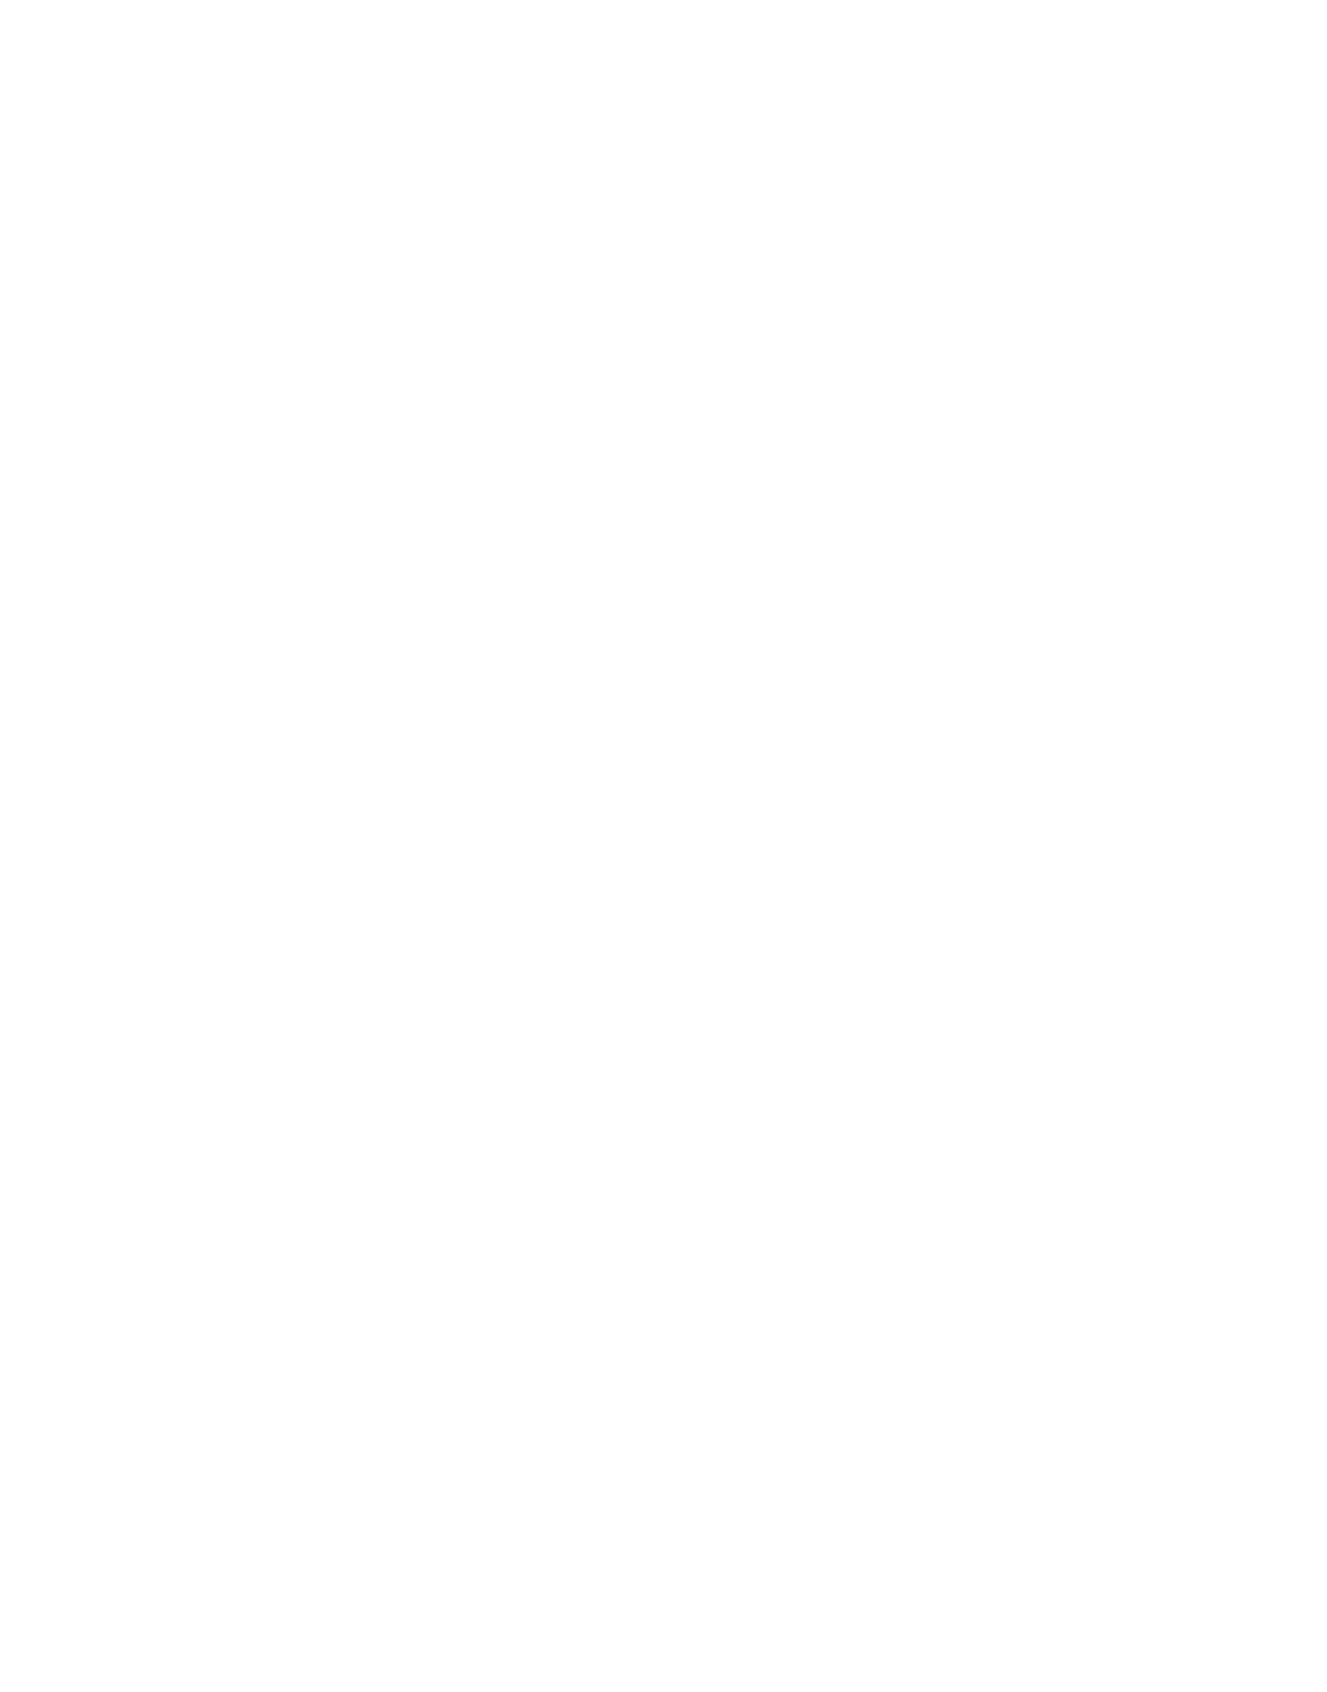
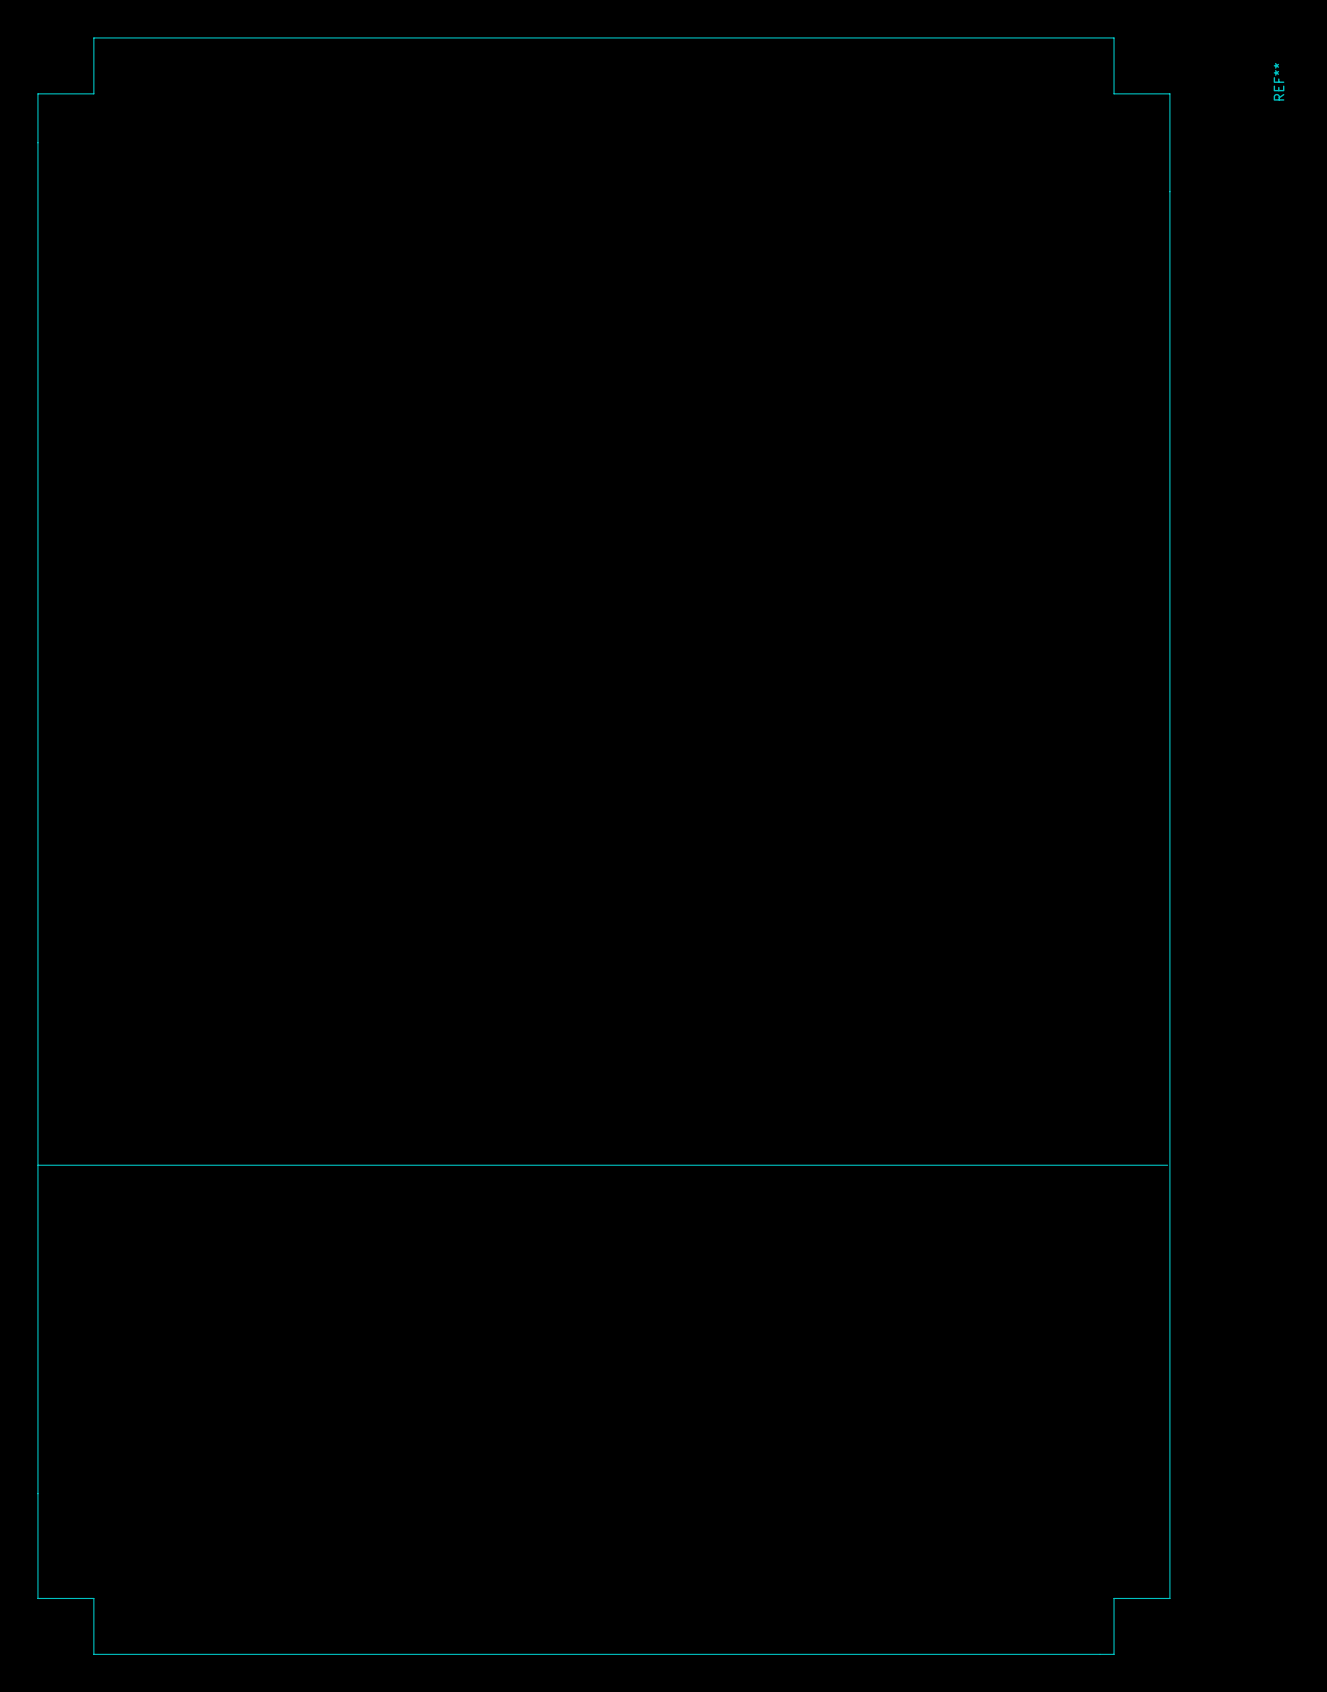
REF**: none -> (603, 846)

